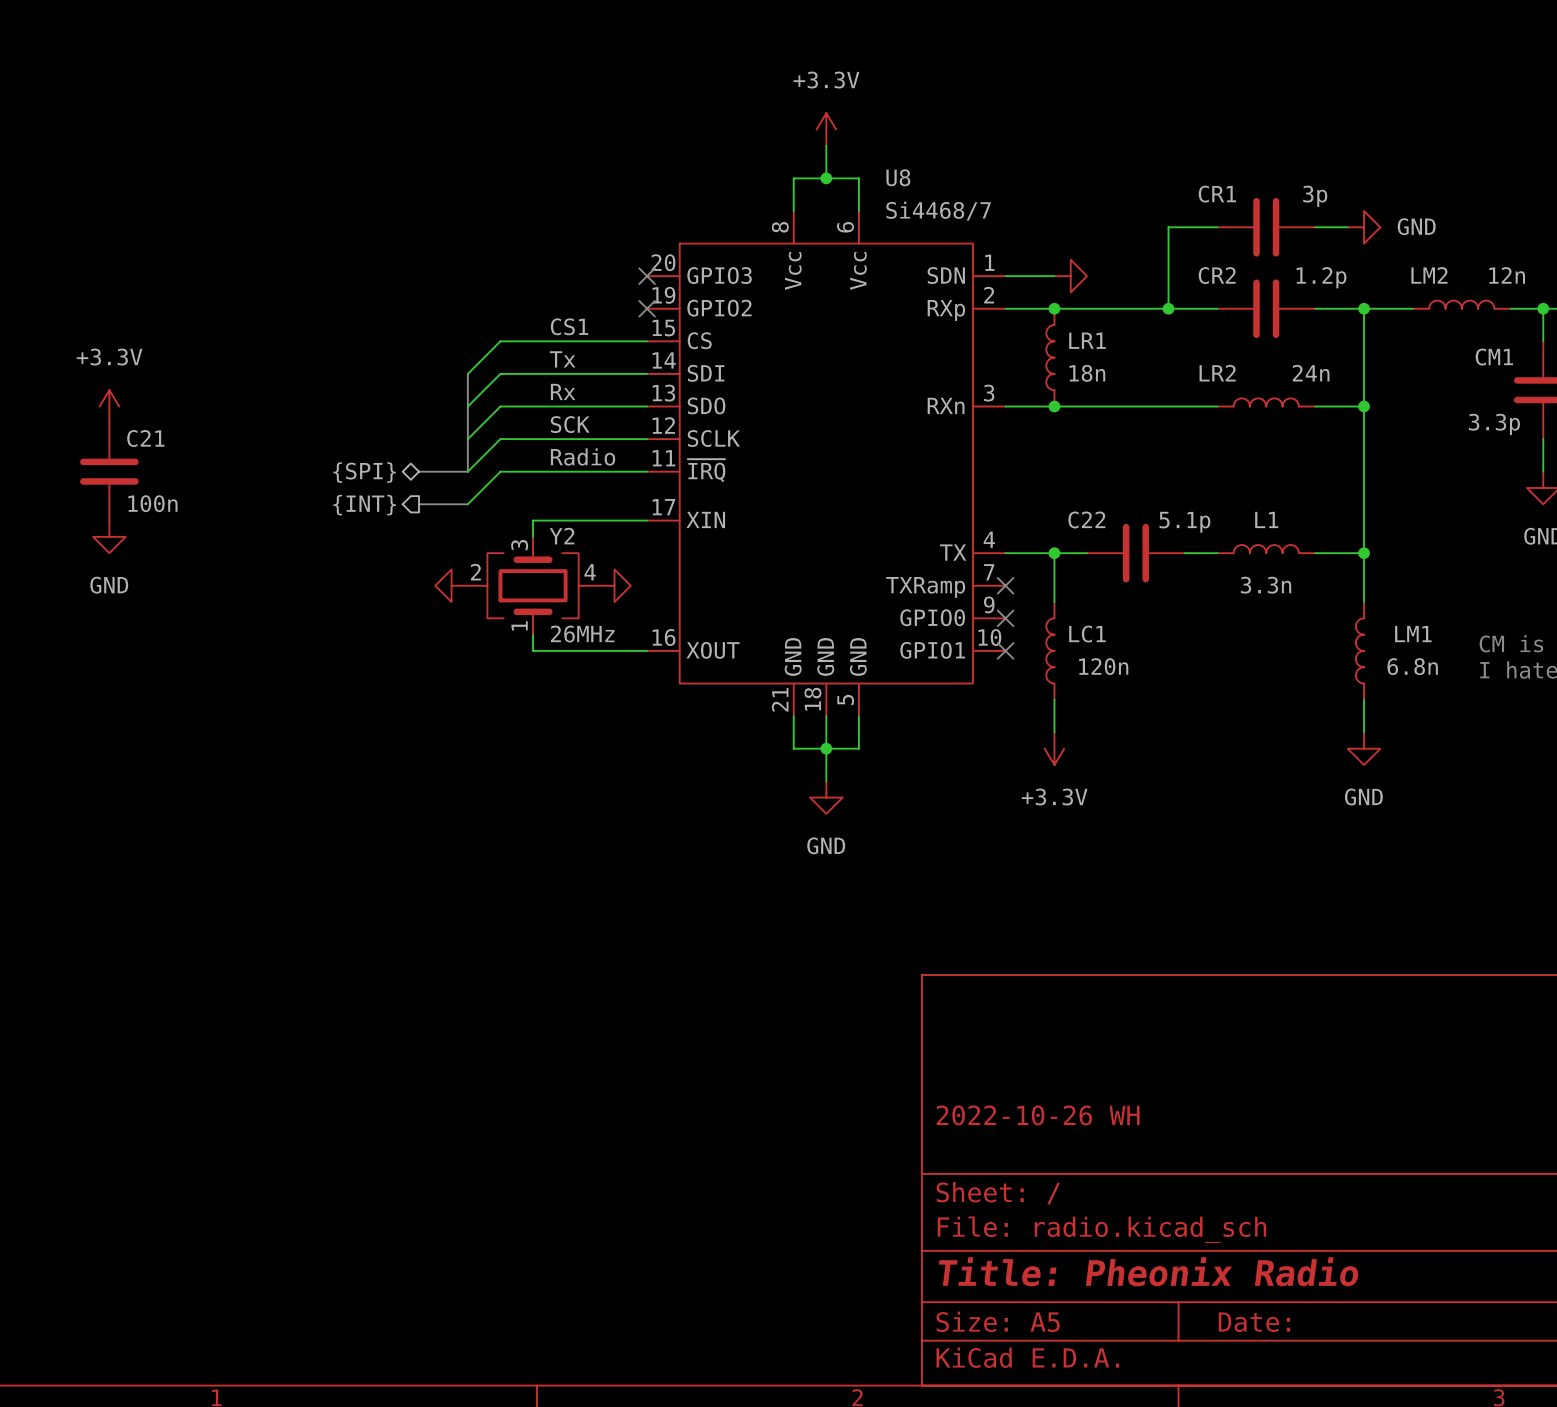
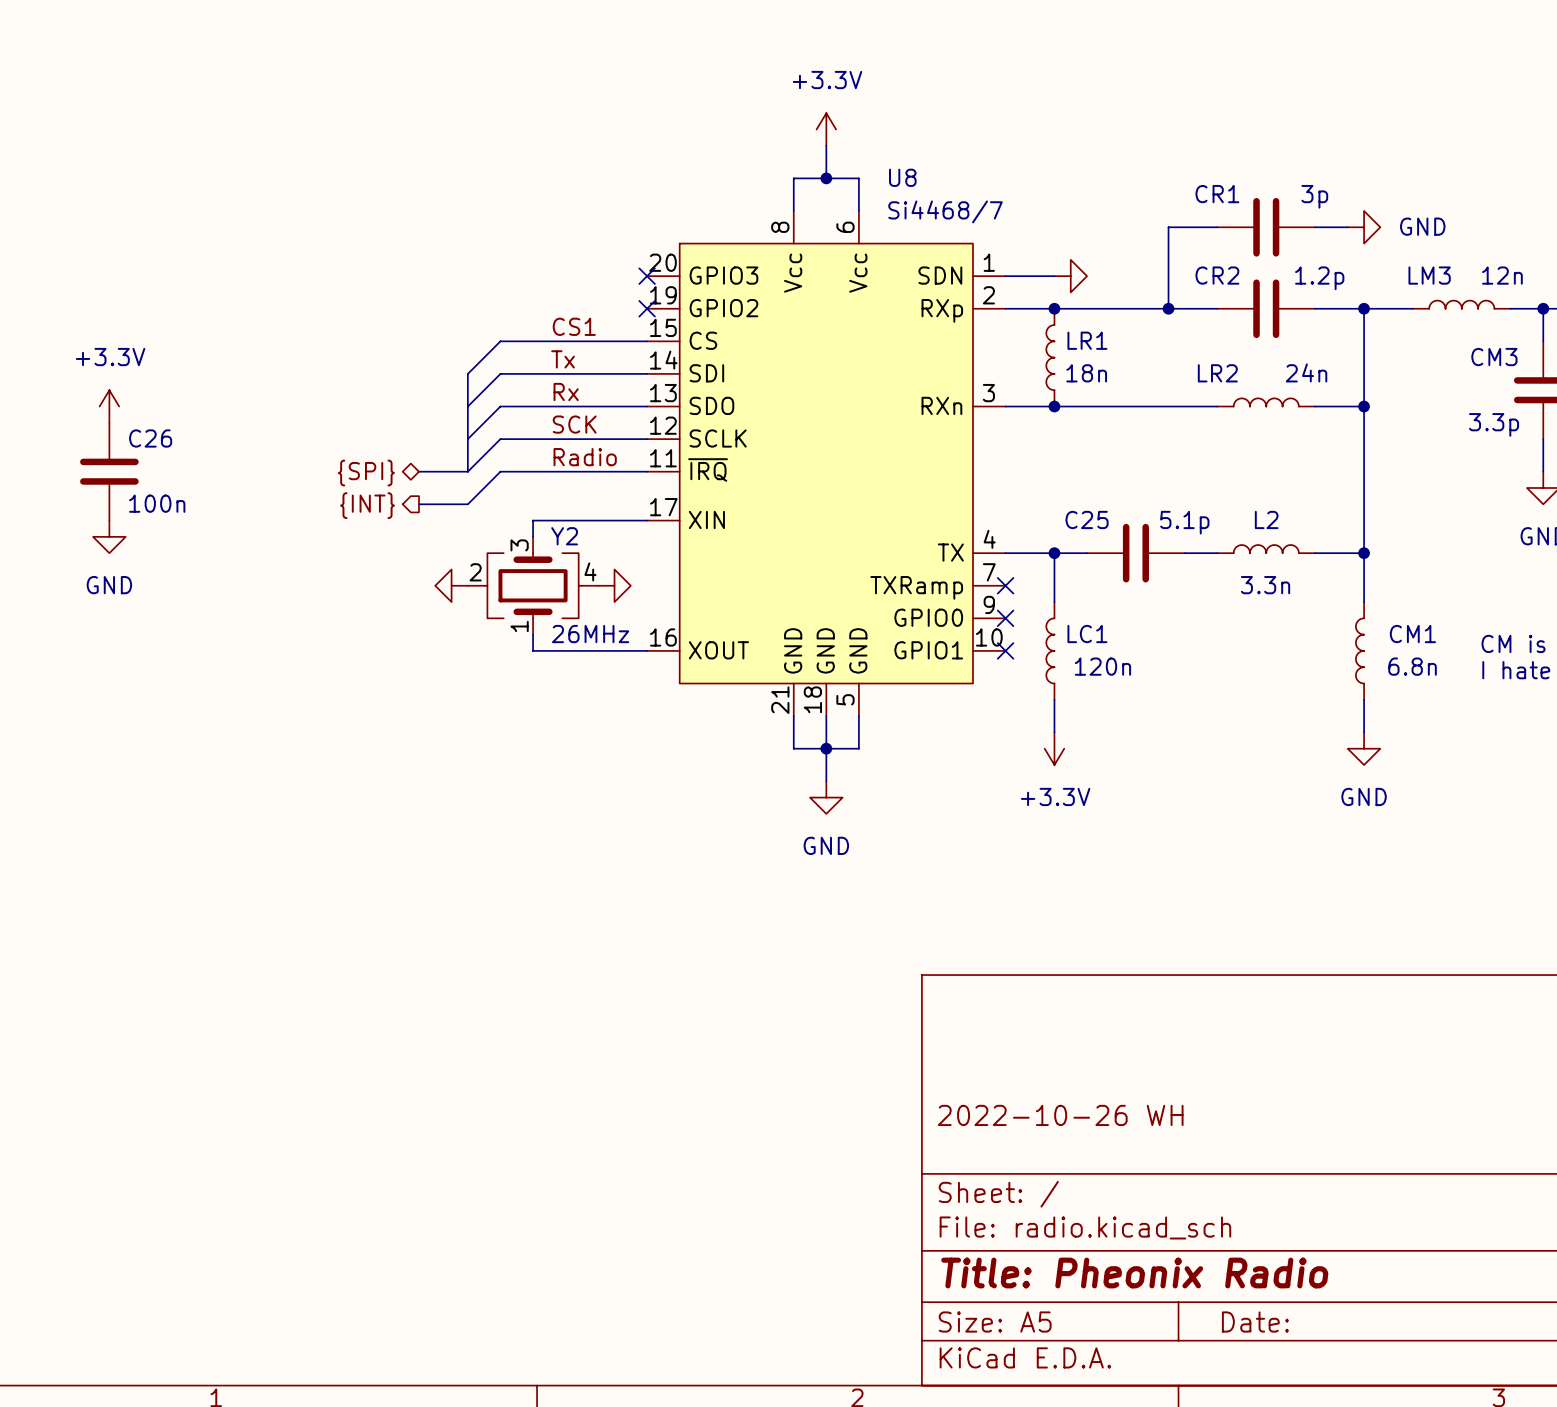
LM2 name: LM2 (1429, 275) -> LM3 (1429, 275)
CM1 name: CM1 (1494, 357) -> CM3 (1494, 357)
C21 name: C21 (145, 438) -> C26 (150, 438)
C22 name: C22 (1086, 519) -> C25 (1087, 519)
L1 name: L1 (1266, 519) -> L2 (1266, 519)
LM1 name: LM1 (1413, 634) -> CM1 (1412, 634)

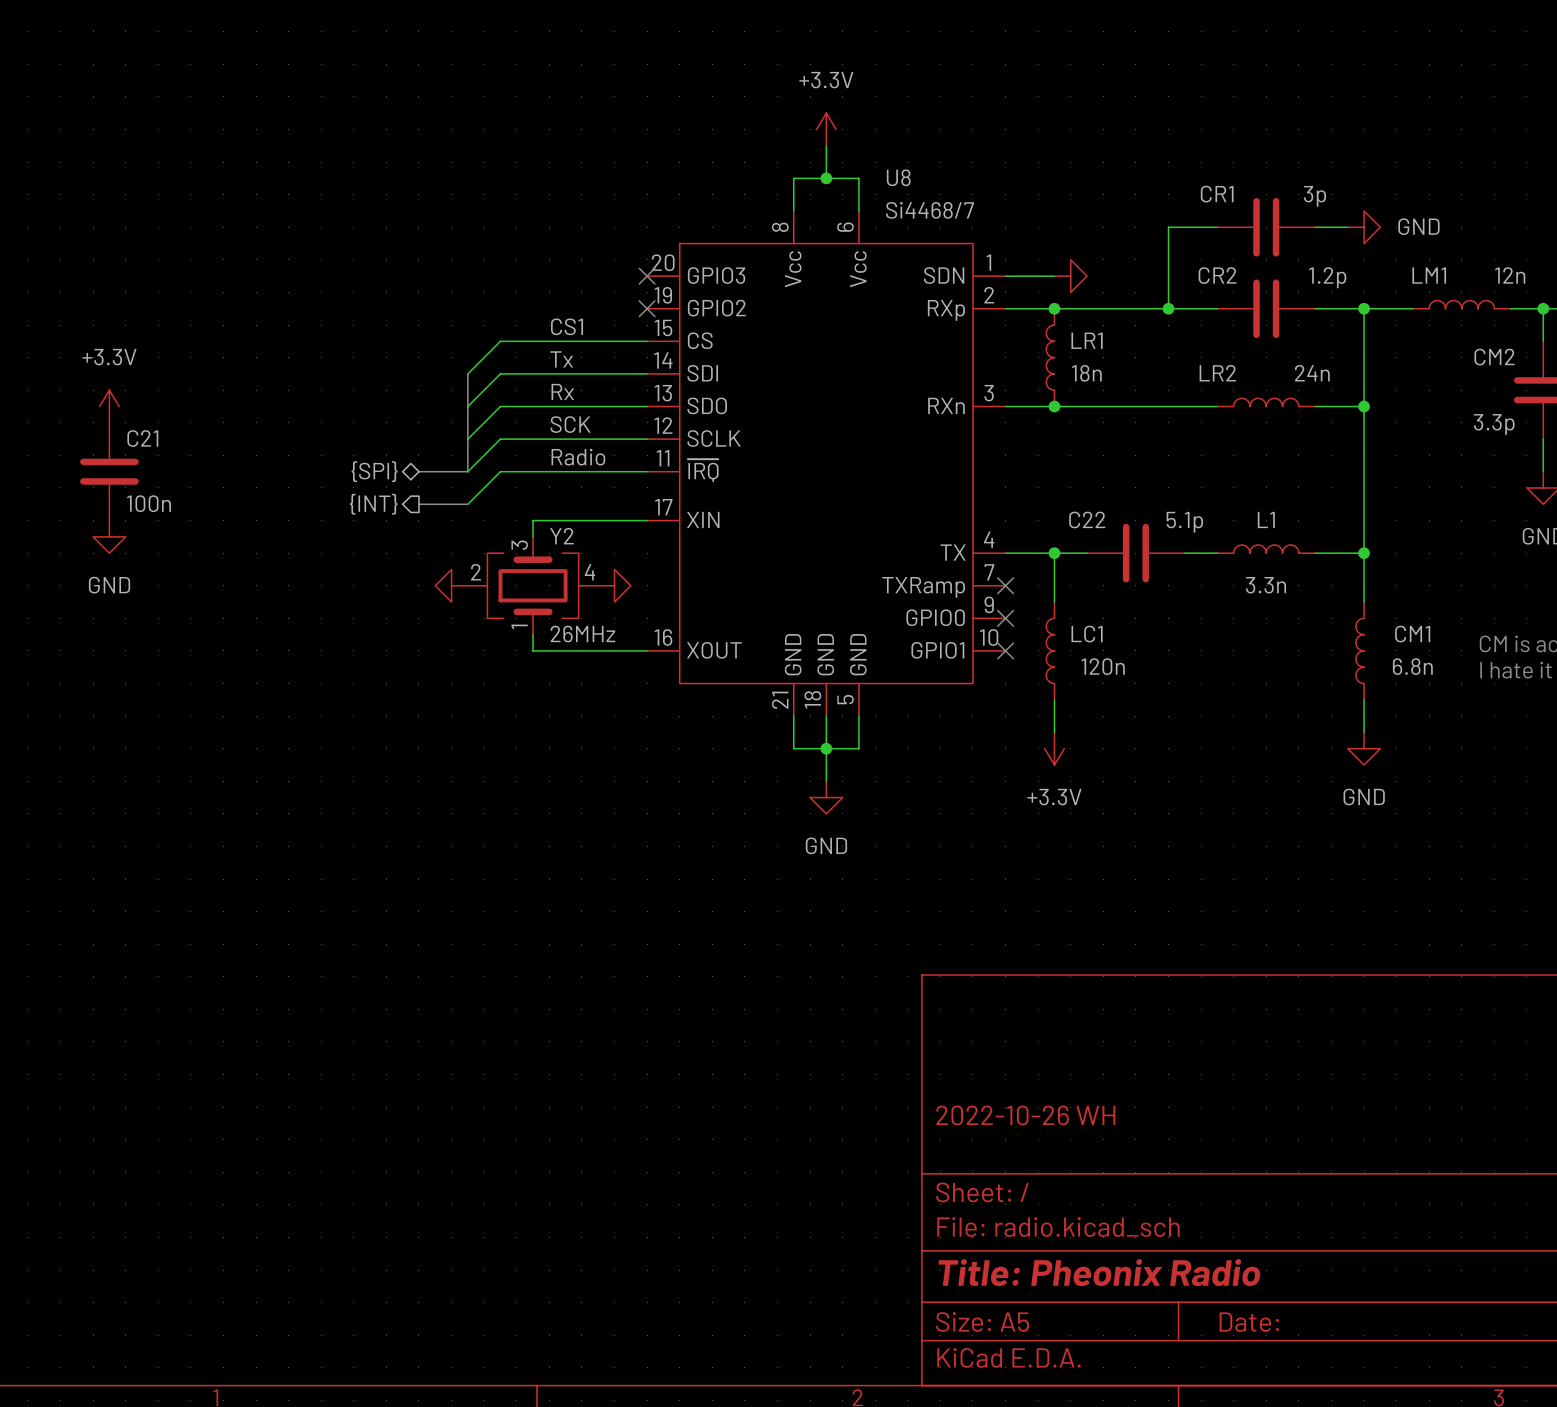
LM3 name: LM3 (1429, 275) -> LM1 (1429, 275)
CM3 name: CM3 (1494, 357) -> CM2 (1494, 357)
C26 name: C26 (150, 438) -> C21 (142, 438)
C25 name: C25 (1087, 519) -> C22 (1087, 519)
L2 name: L2 (1266, 519) -> L1 (1266, 519)

